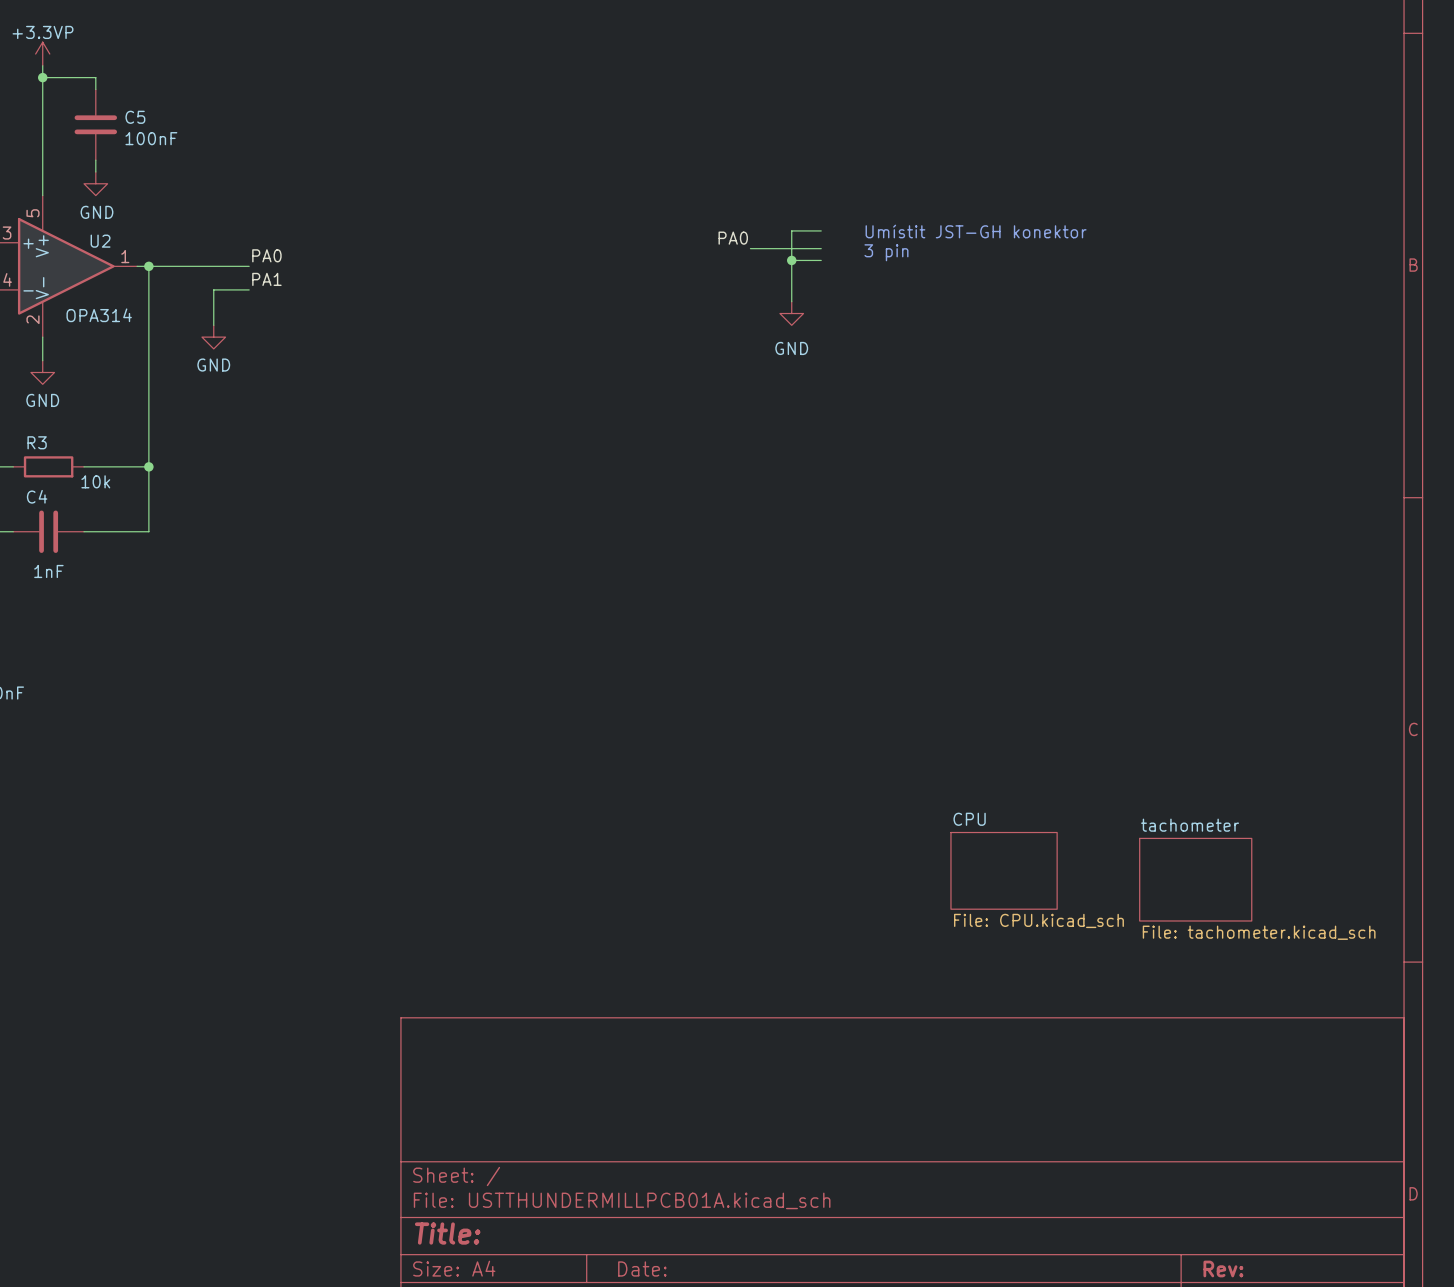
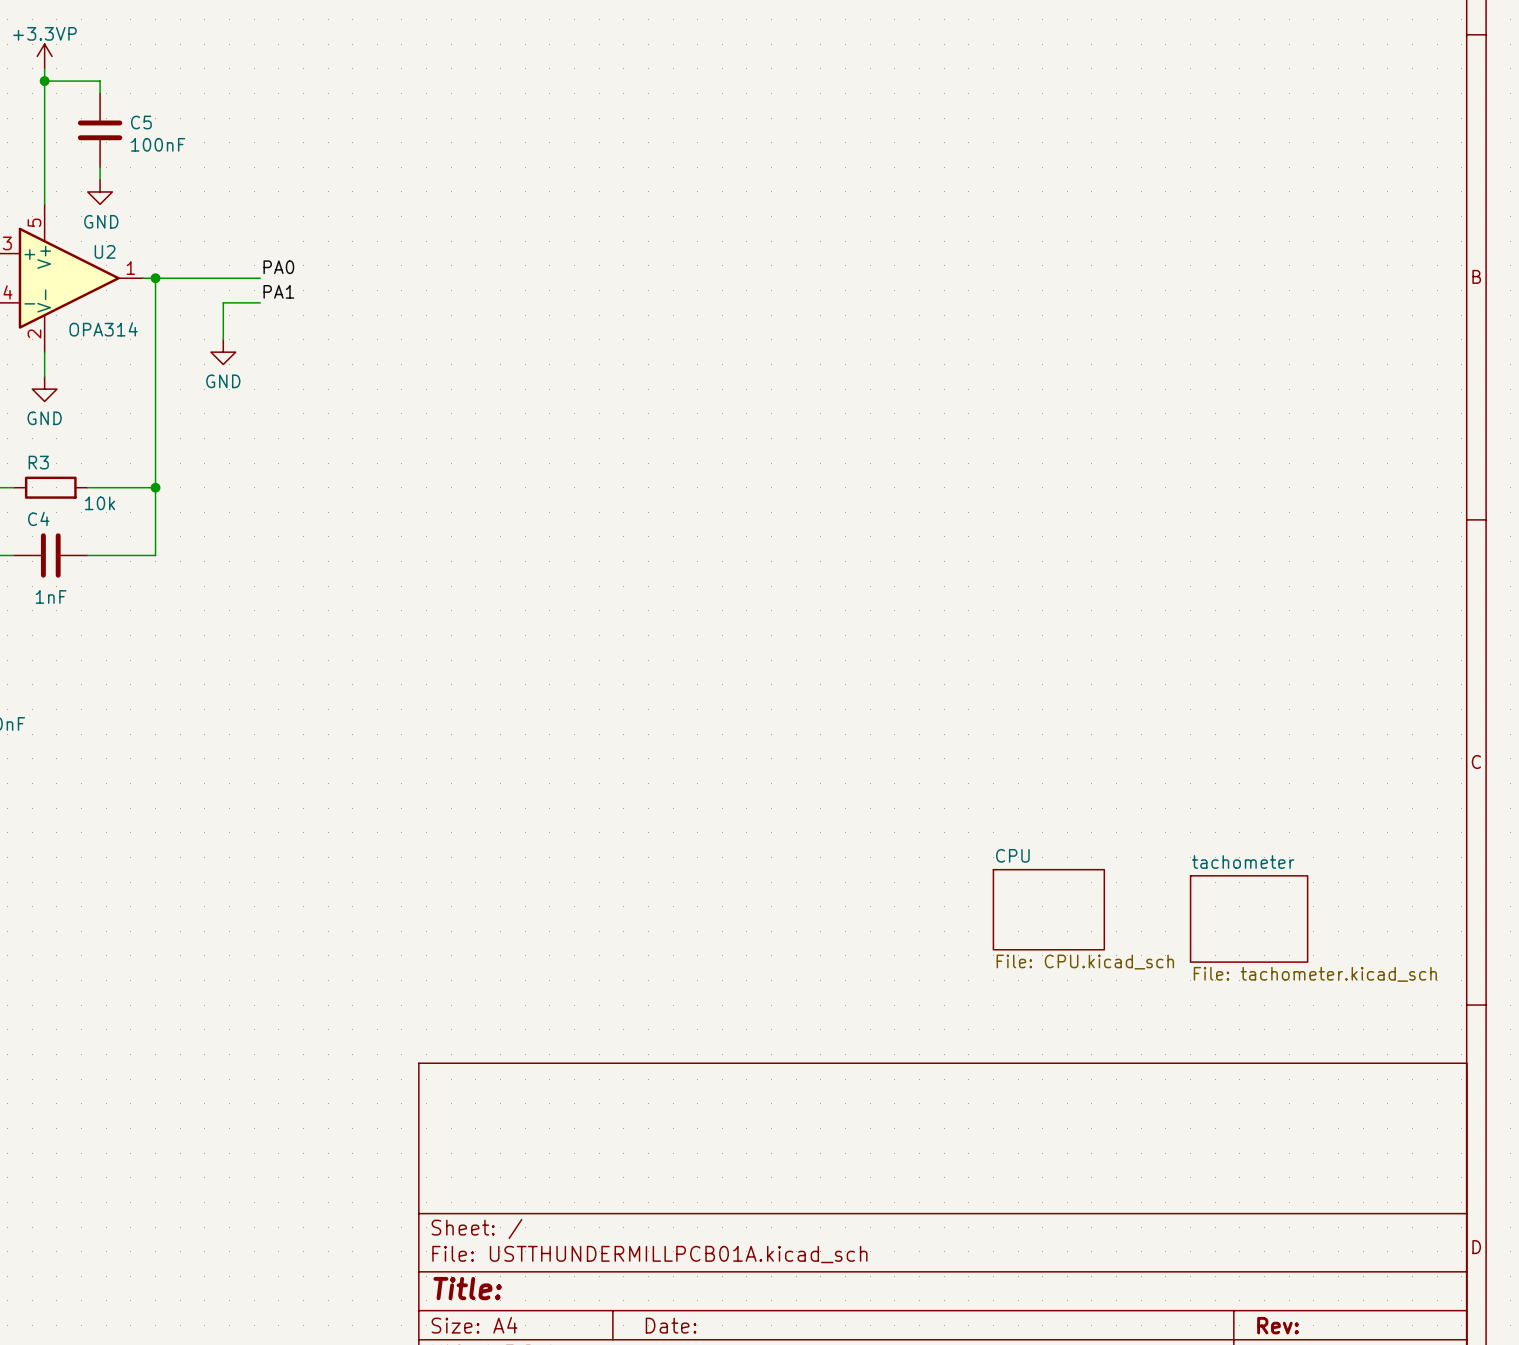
wire: (821, 230) (791, 230) (791, 301) -> none
text: Umístit JST-GH konektor (976, 231) -> none
label: PA0 (733, 238) -> none
wire: (750, 248) (821, 248) -> none
text: 3 pin (886, 252) -> none
wire: (791, 260) (821, 260) -> none
junction: (791, 260) -> none
power symbol: GND (791, 313) -> none

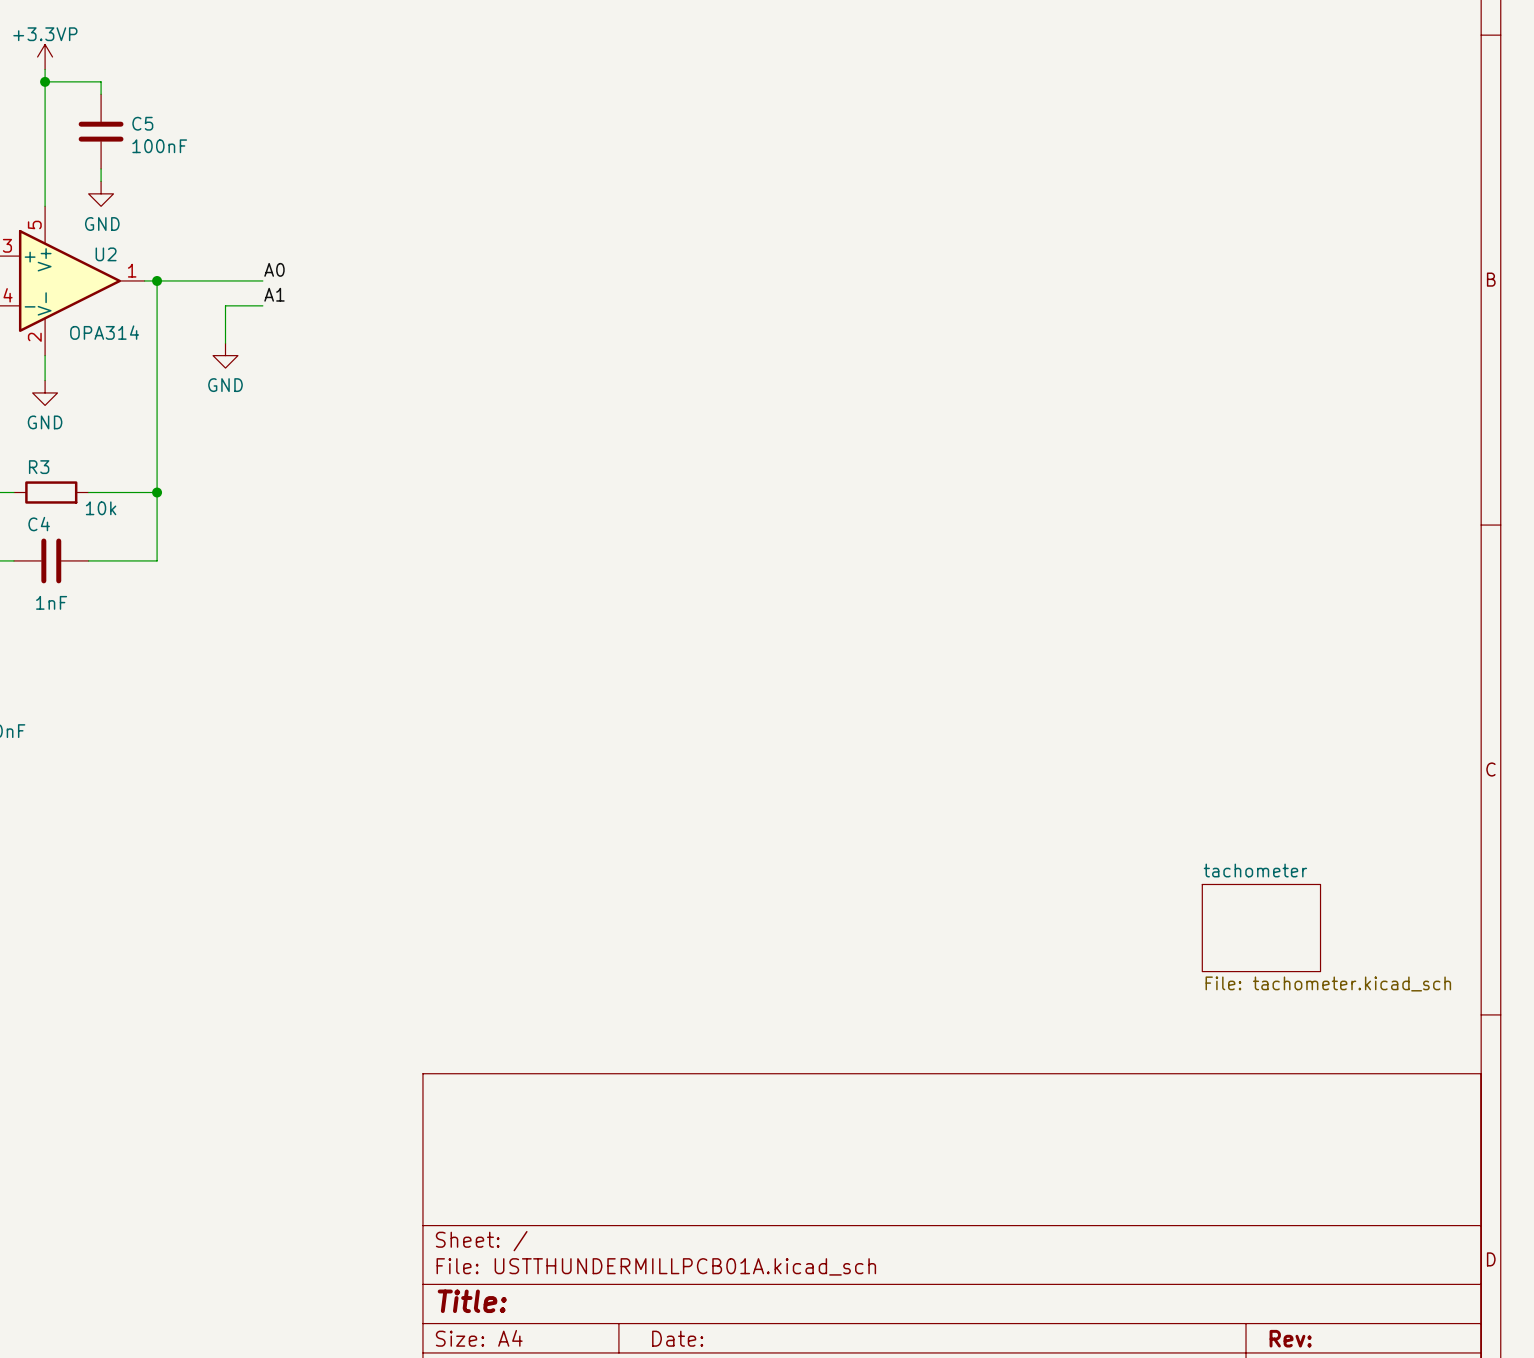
label: PA0 (278, 267) -> A0 (274, 269)
label: PA1 (278, 291) -> A1 (274, 294)
sheet CPU: File: CPU.kicad_sch (1048, 909) -> none

